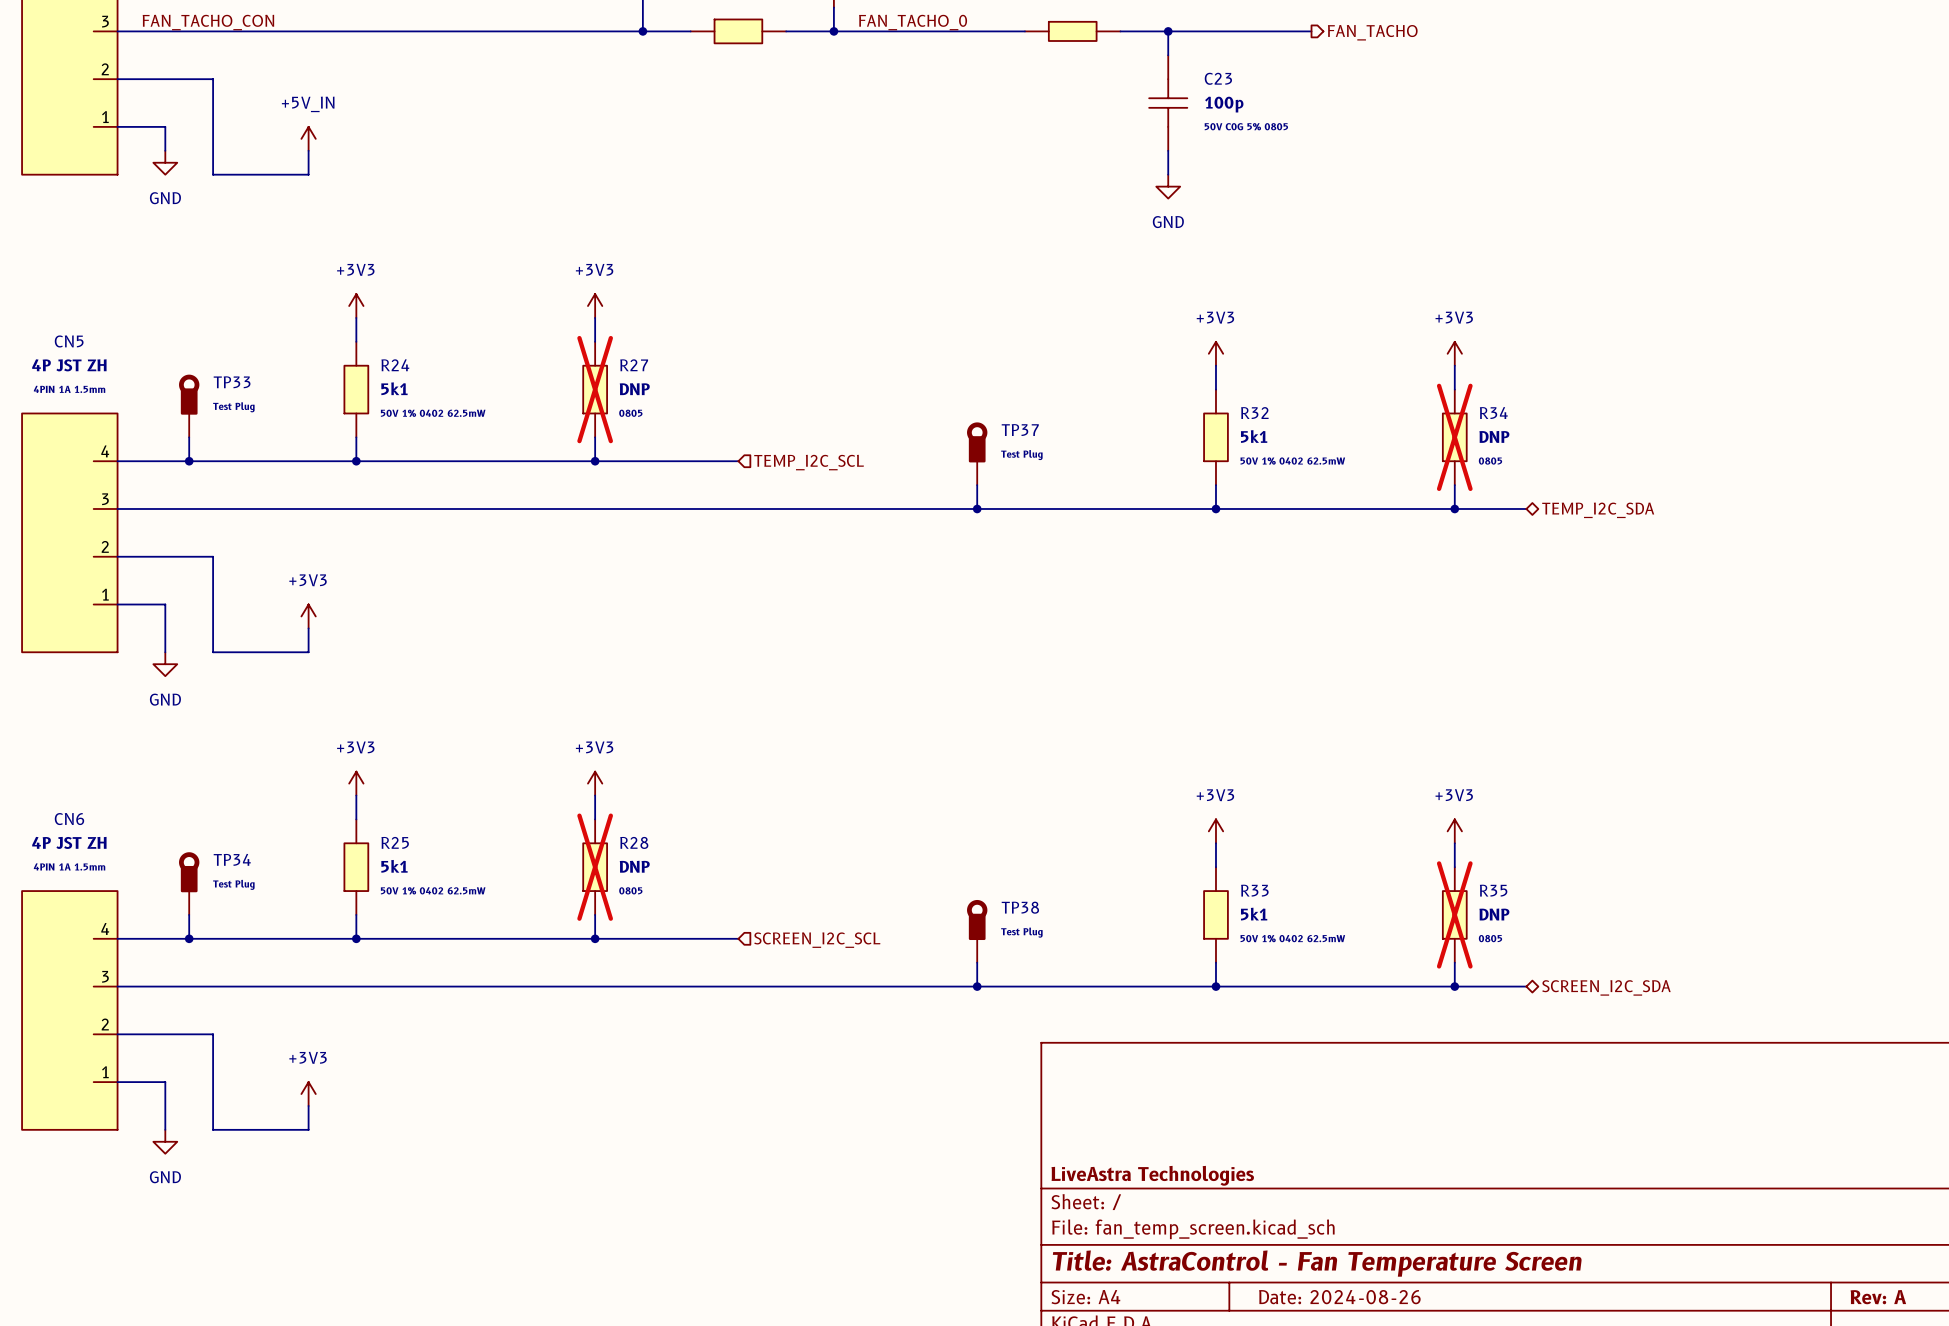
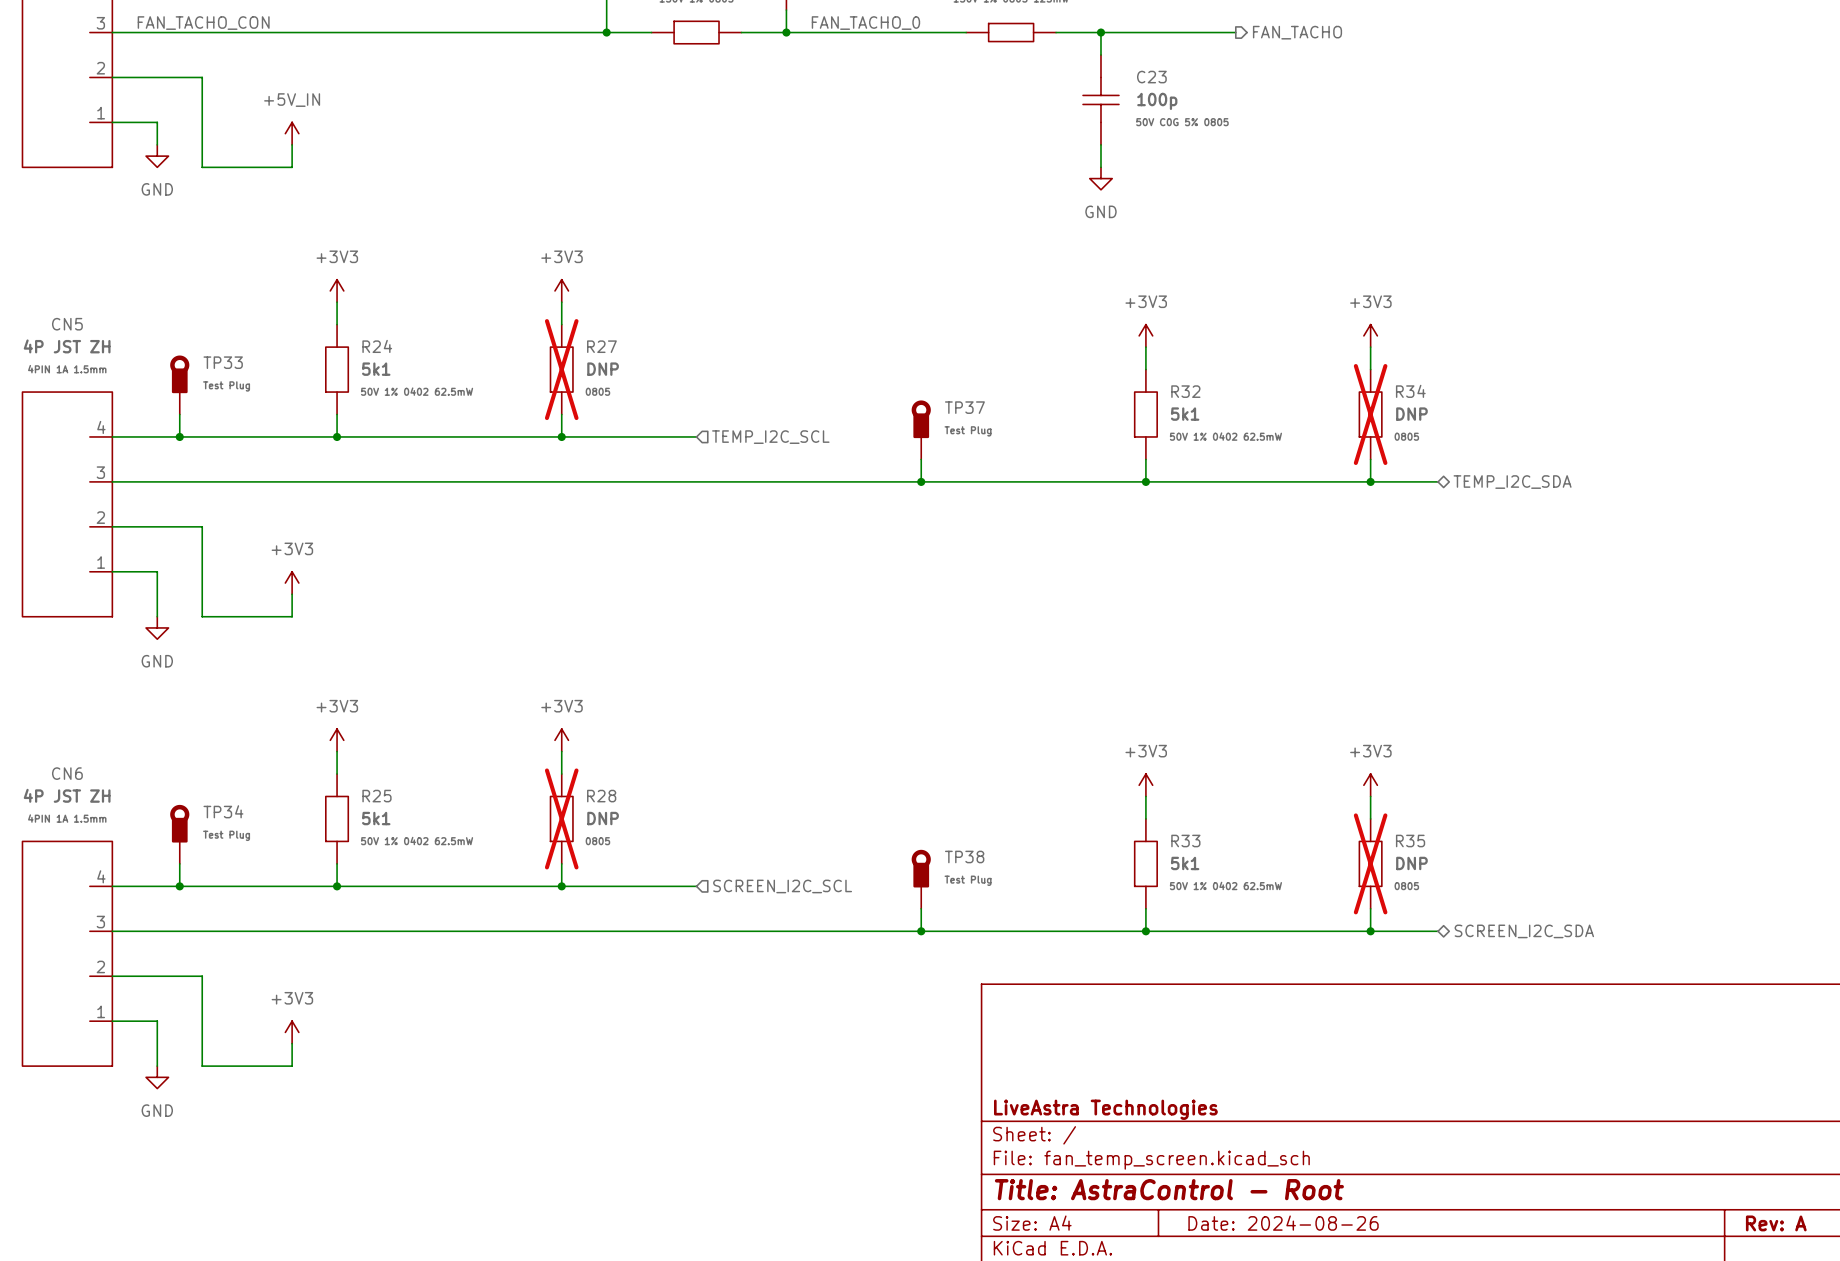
title block: Title: AstraControl - Fan Temperature Screen (1317, 1263) -> Title: AstraControl - Root (1169, 1189)

